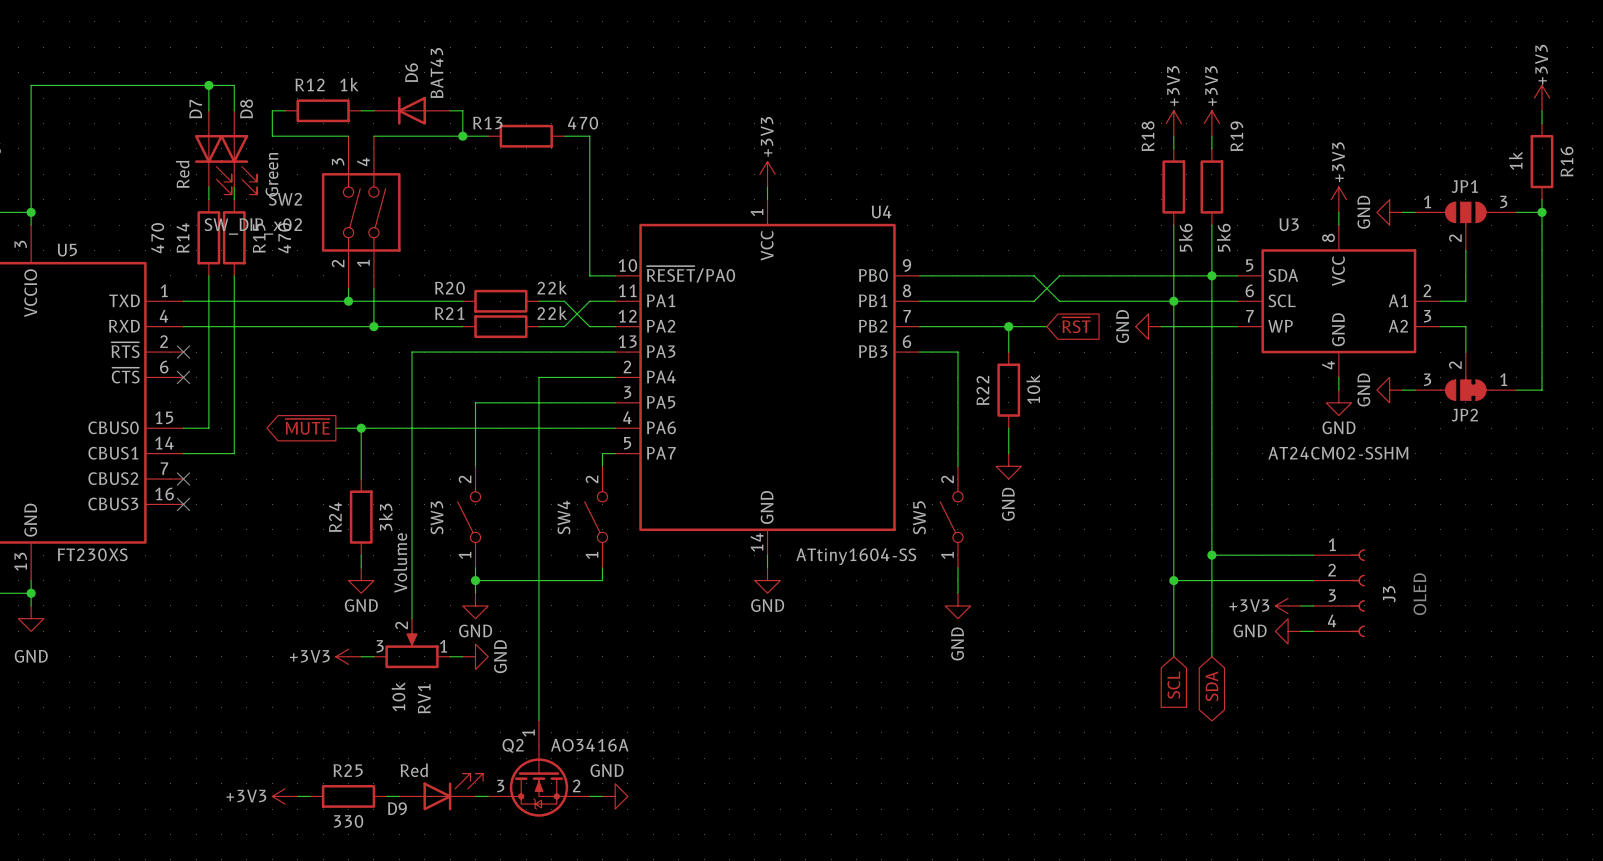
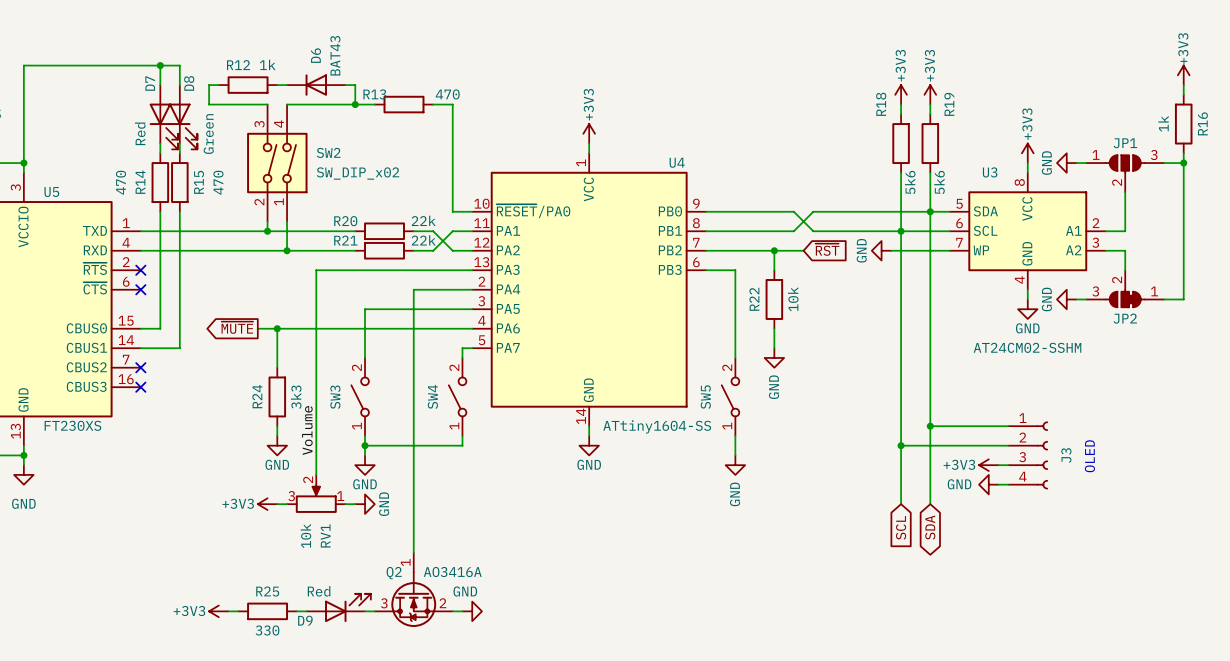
SW2 name position: SW2 (285, 199) -> SW2 (328, 152)
SW2 value position: SW_DIP_x02 (253, 226) -> SW_DIP_x02 (358, 173)

